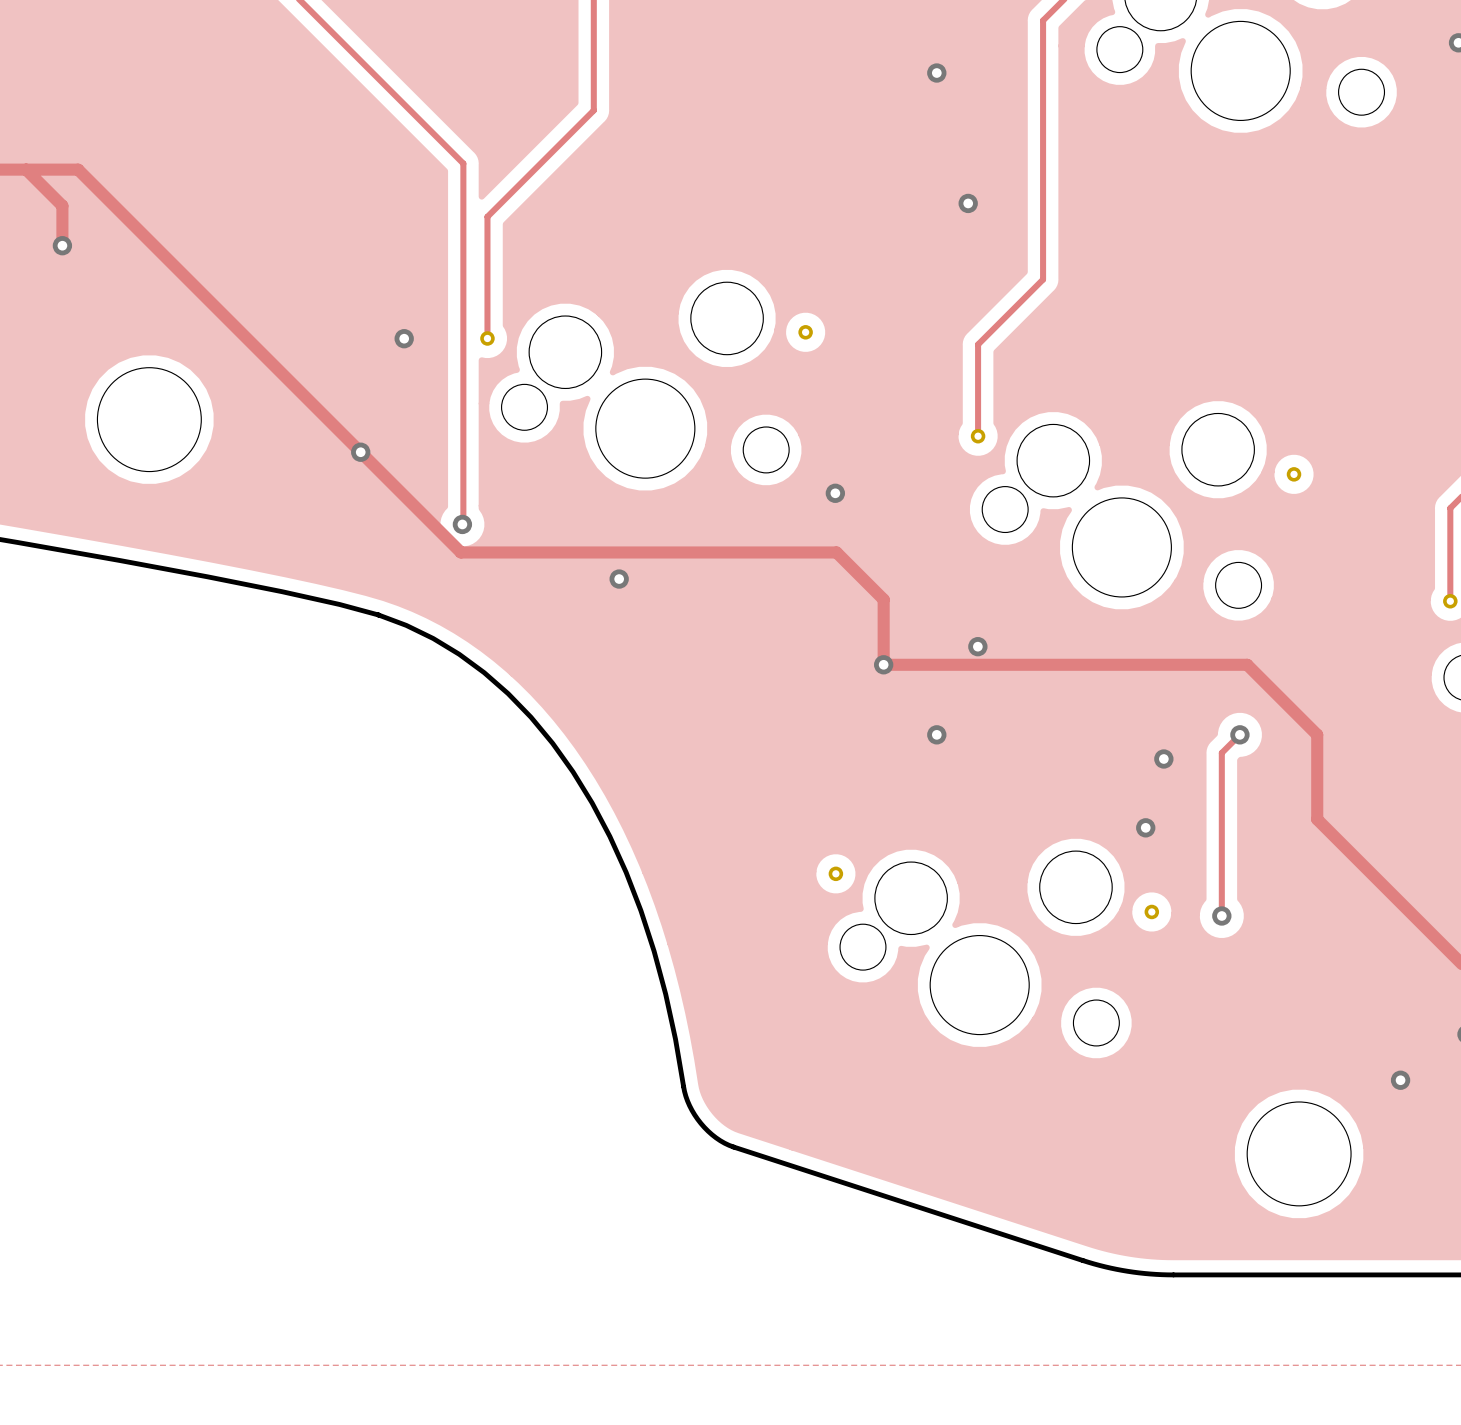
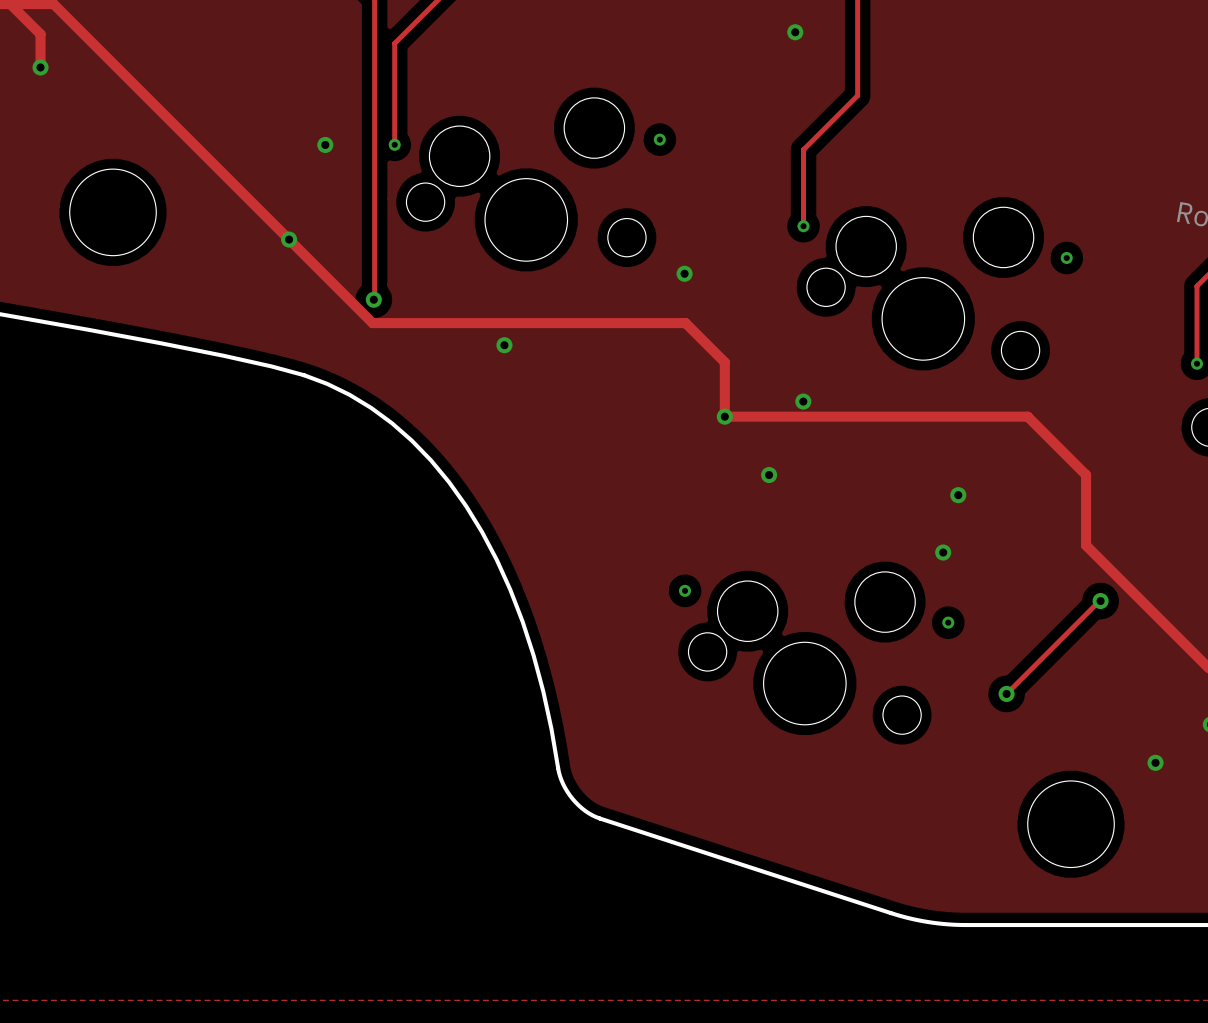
track: (1239, 734) (1221, 752) (1221, 916) -> none
via: (1239, 734) -> none
track: none -> (1100, 601) (1006, 693)
via: none -> (1100, 601)
via: (1221, 916) -> none
via: none -> (1006, 693)

